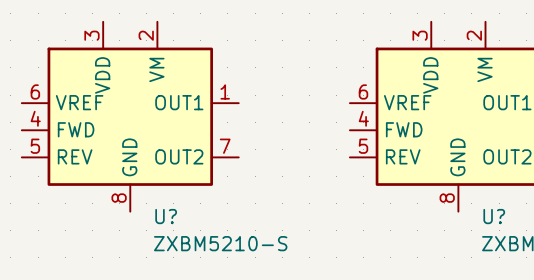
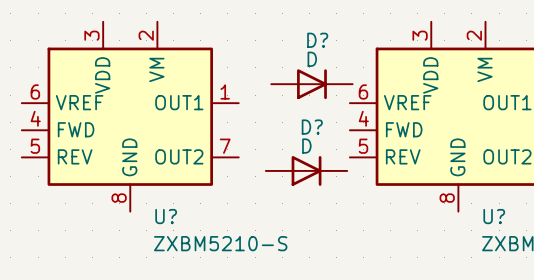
D?: none -> D (311, 84)
D?: none -> D (306, 170)

